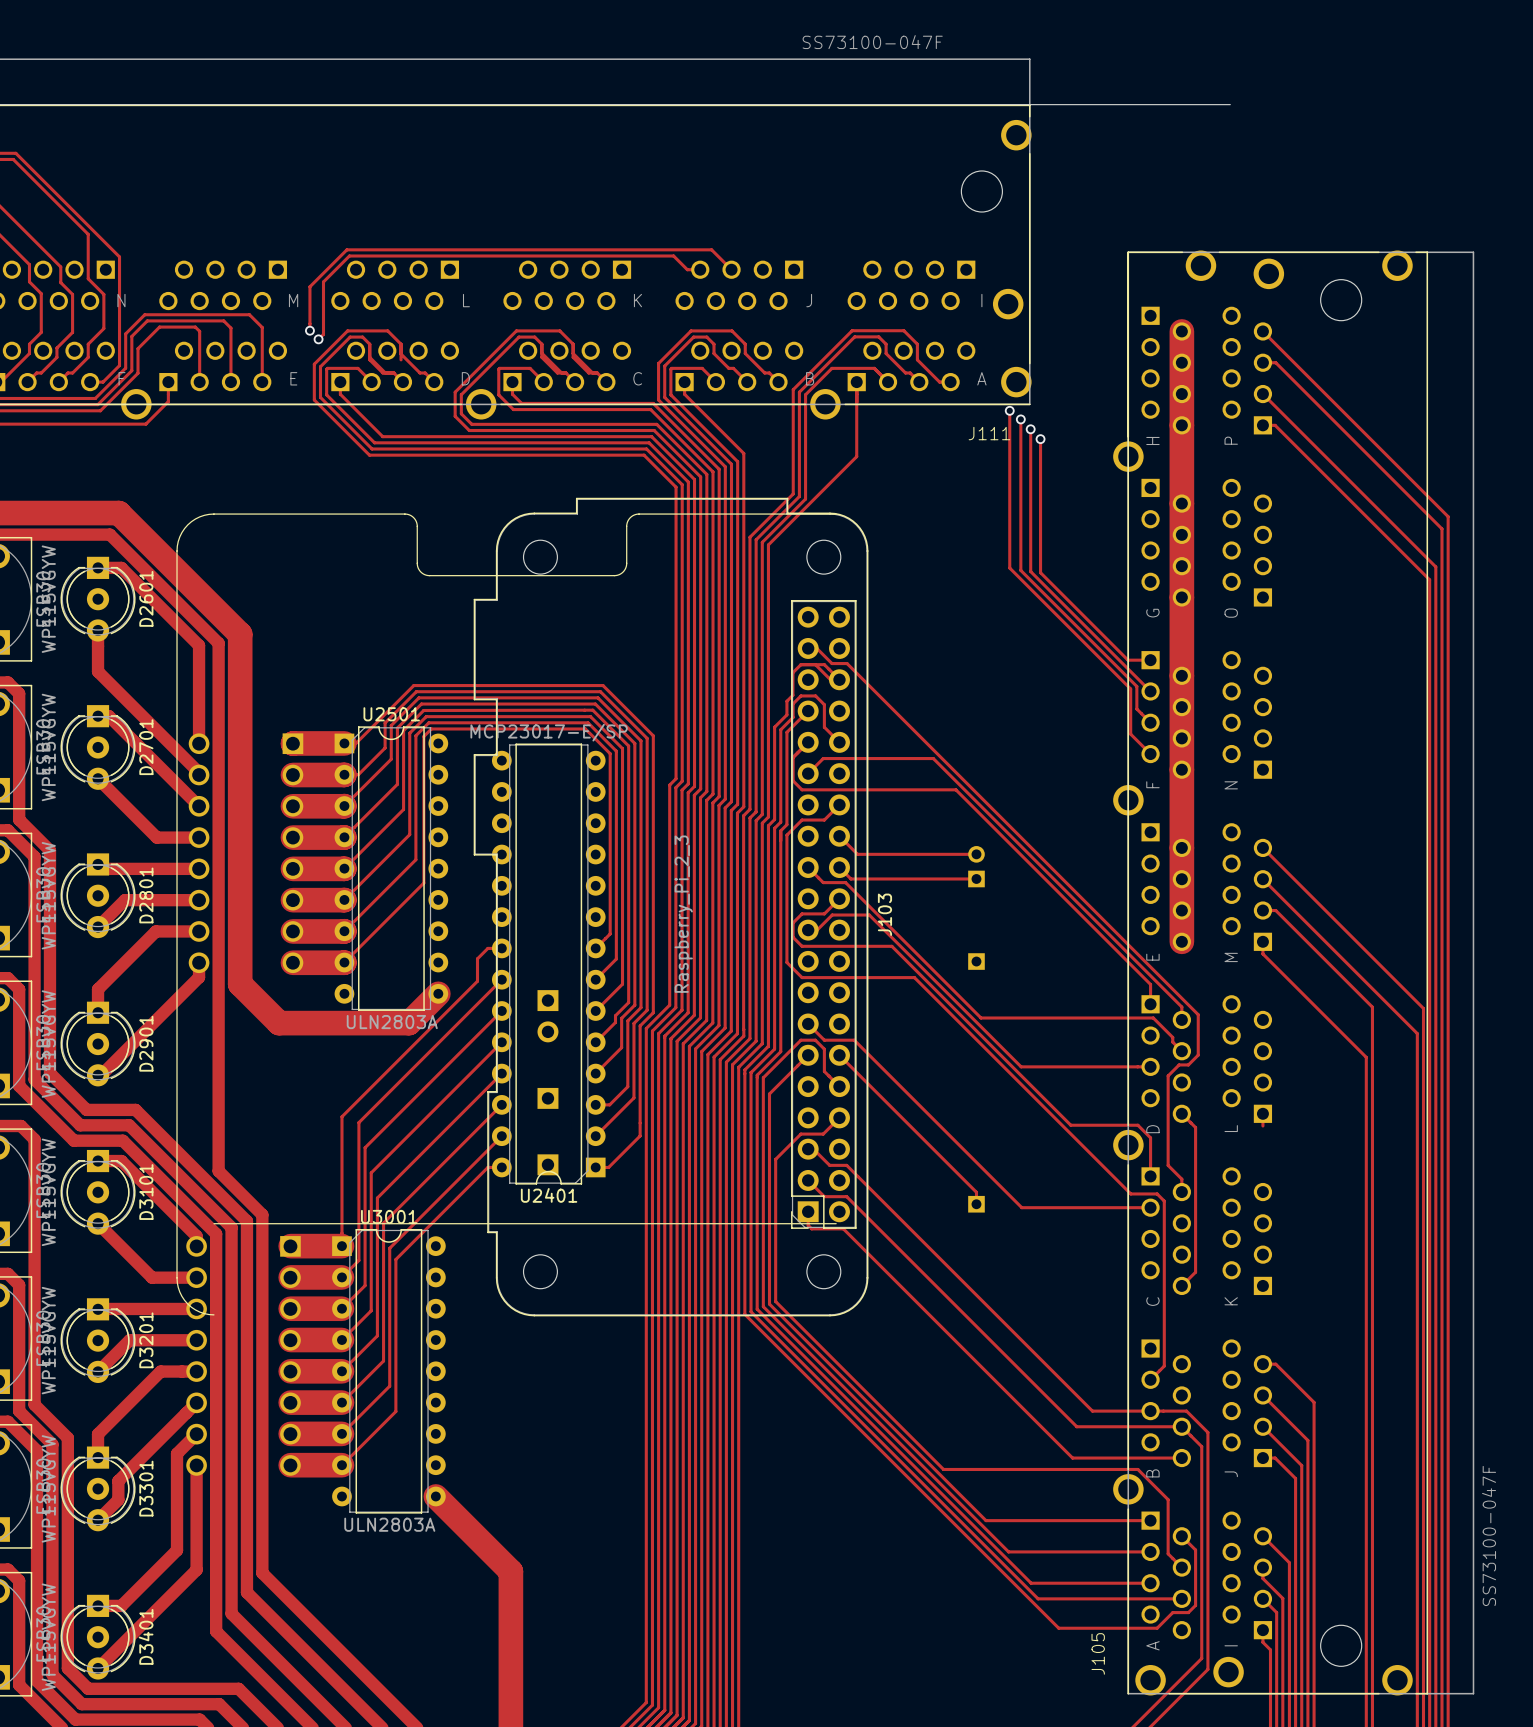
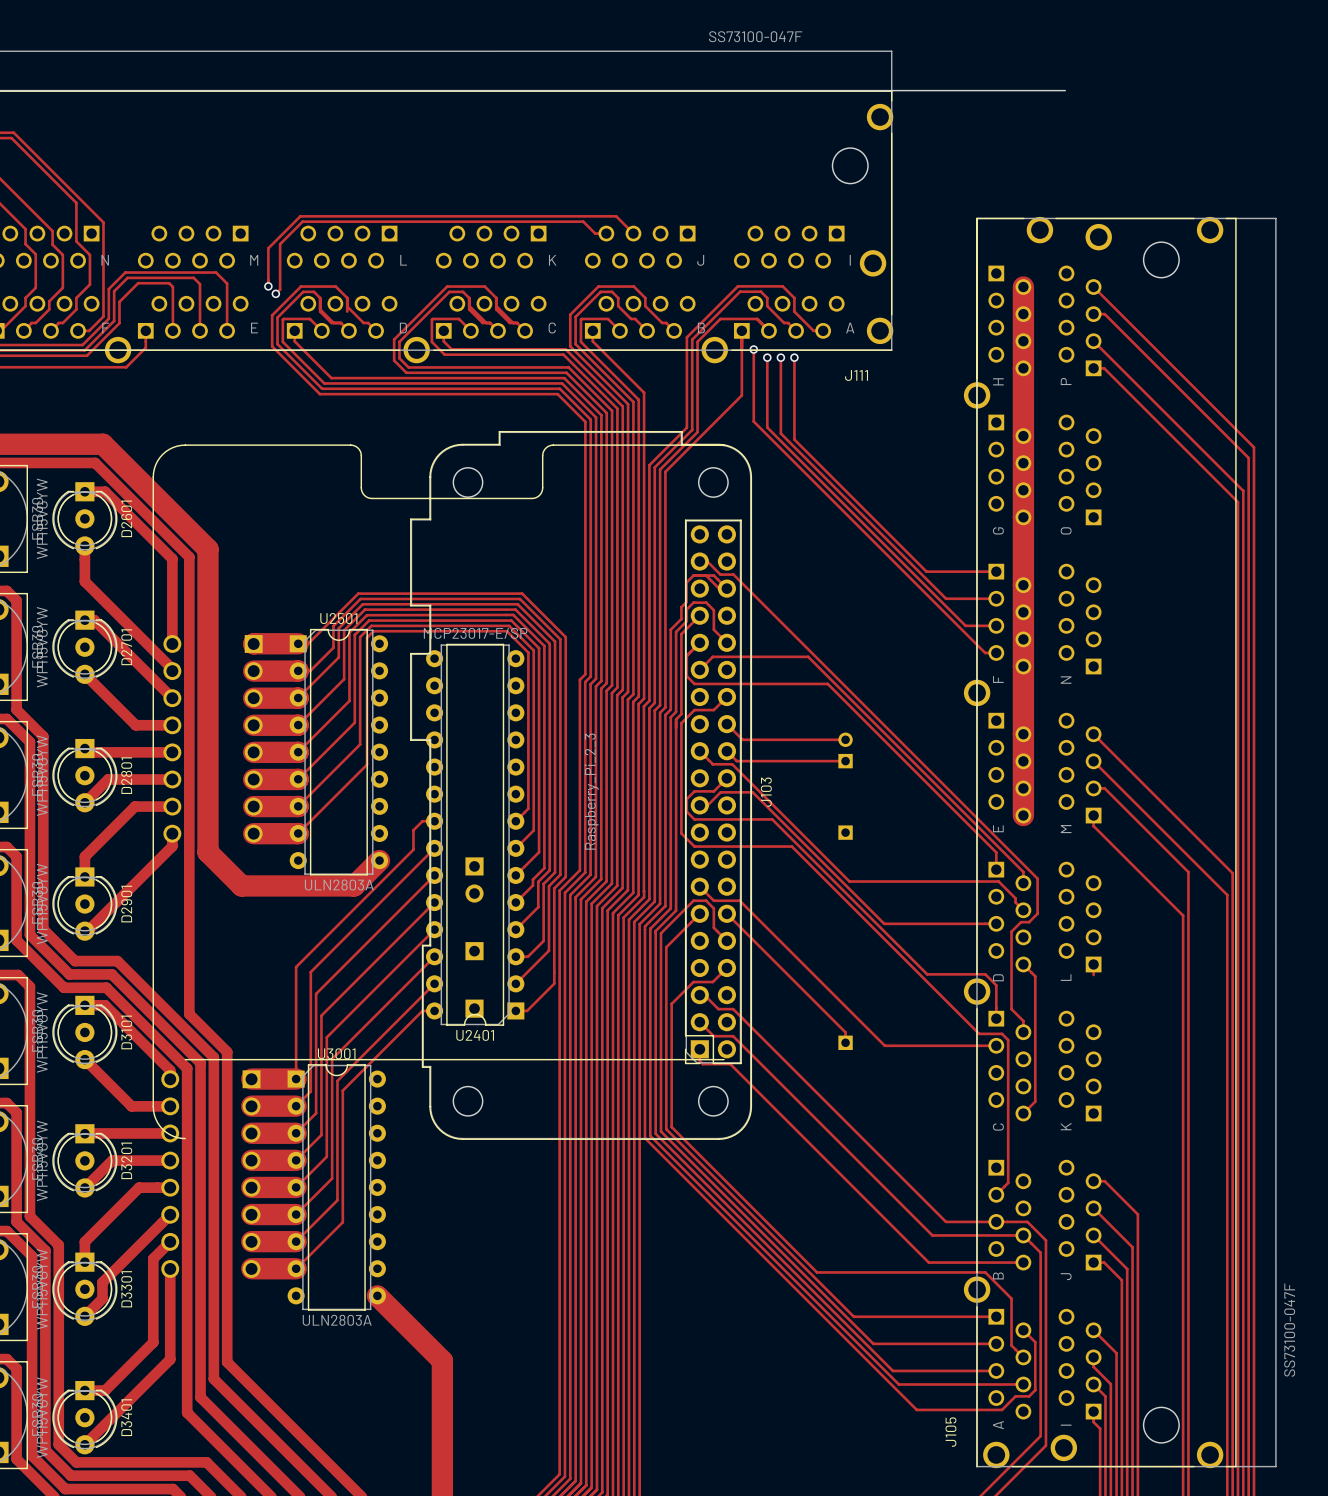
via: none -> (753, 349)
track: (1009, 410) (1009, 568) (1130, 689) (1130, 734) (1150, 754) -> (753, 349) (753, 421) (985, 652) (996, 652)
via: (1009, 410) -> none
via: none -> (767, 357)
via: none -> (780, 357)
via: none -> (794, 357)
track: (1020, 419) (1020, 570) (1136, 686) (1136, 709) (1150, 722) -> (767, 357) (767, 427) (965, 625) (996, 625)
via: (1020, 419) -> none
track: (1030, 429) (1030, 571) (1150, 691) -> (780, 357) (780, 433) (946, 598) (996, 598)
via: (1030, 429) -> none
track: (1040, 439) (1040, 572) (1127, 660) -> (794, 357) (794, 439) (926, 571) (976, 571)
via: (1040, 439) -> none

